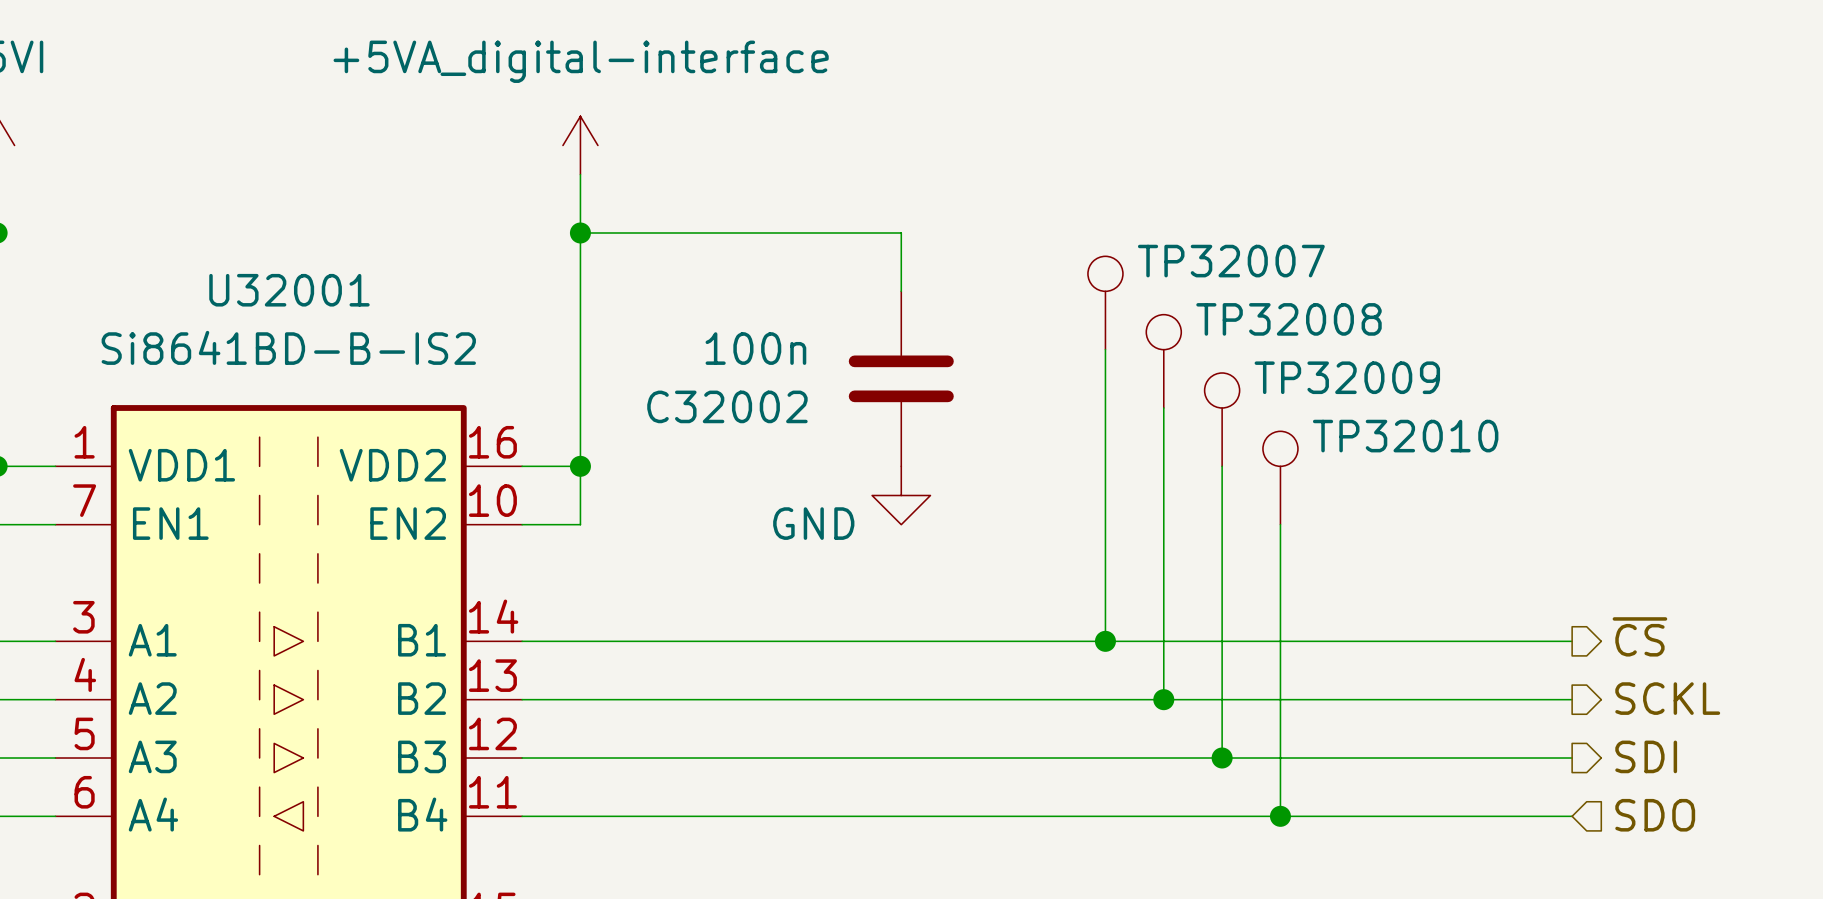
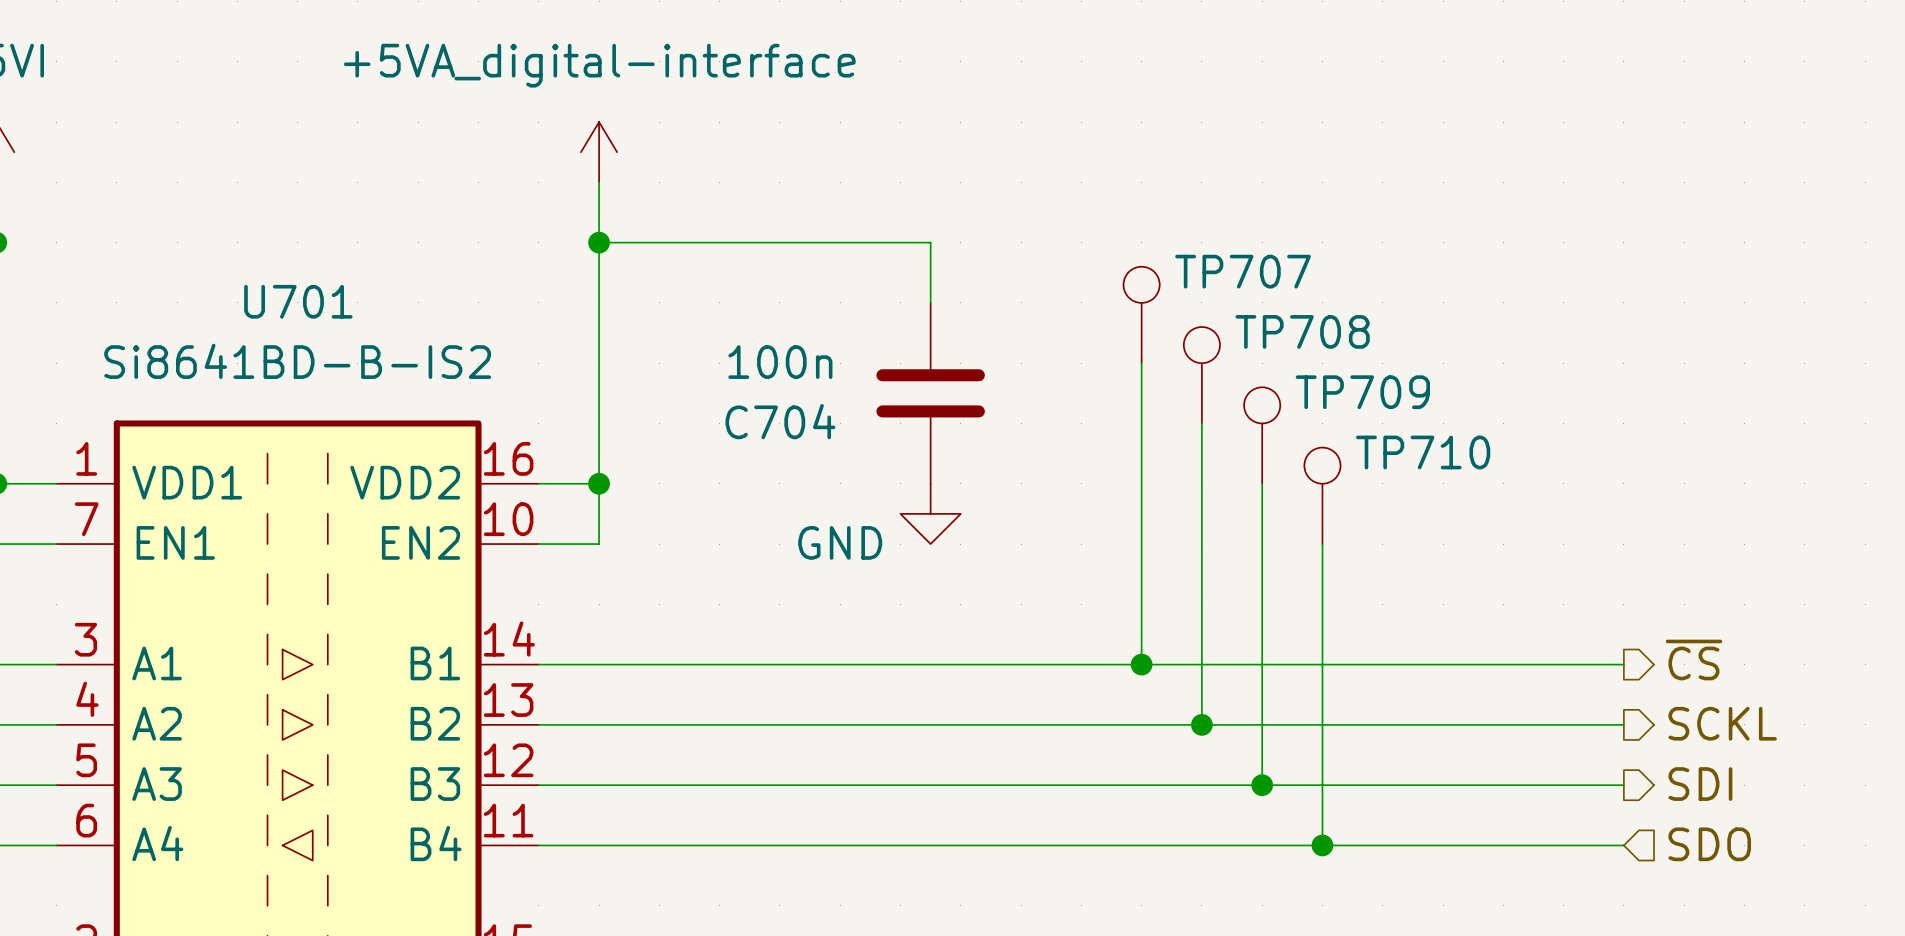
TP32007 name: TP32007 (1231, 261) -> TP707 (1243, 271)
U32001 name: U32001 (289, 290) -> U701 (298, 301)
TP32008 name: TP32008 (1289, 319) -> TP708 (1302, 331)
TP32009 name: TP32009 (1347, 377) -> TP709 (1362, 392)
C32002 name: C32002 (727, 406) -> C704 (780, 421)
TP32010 name: TP32010 (1405, 436) -> TP710 (1423, 452)

